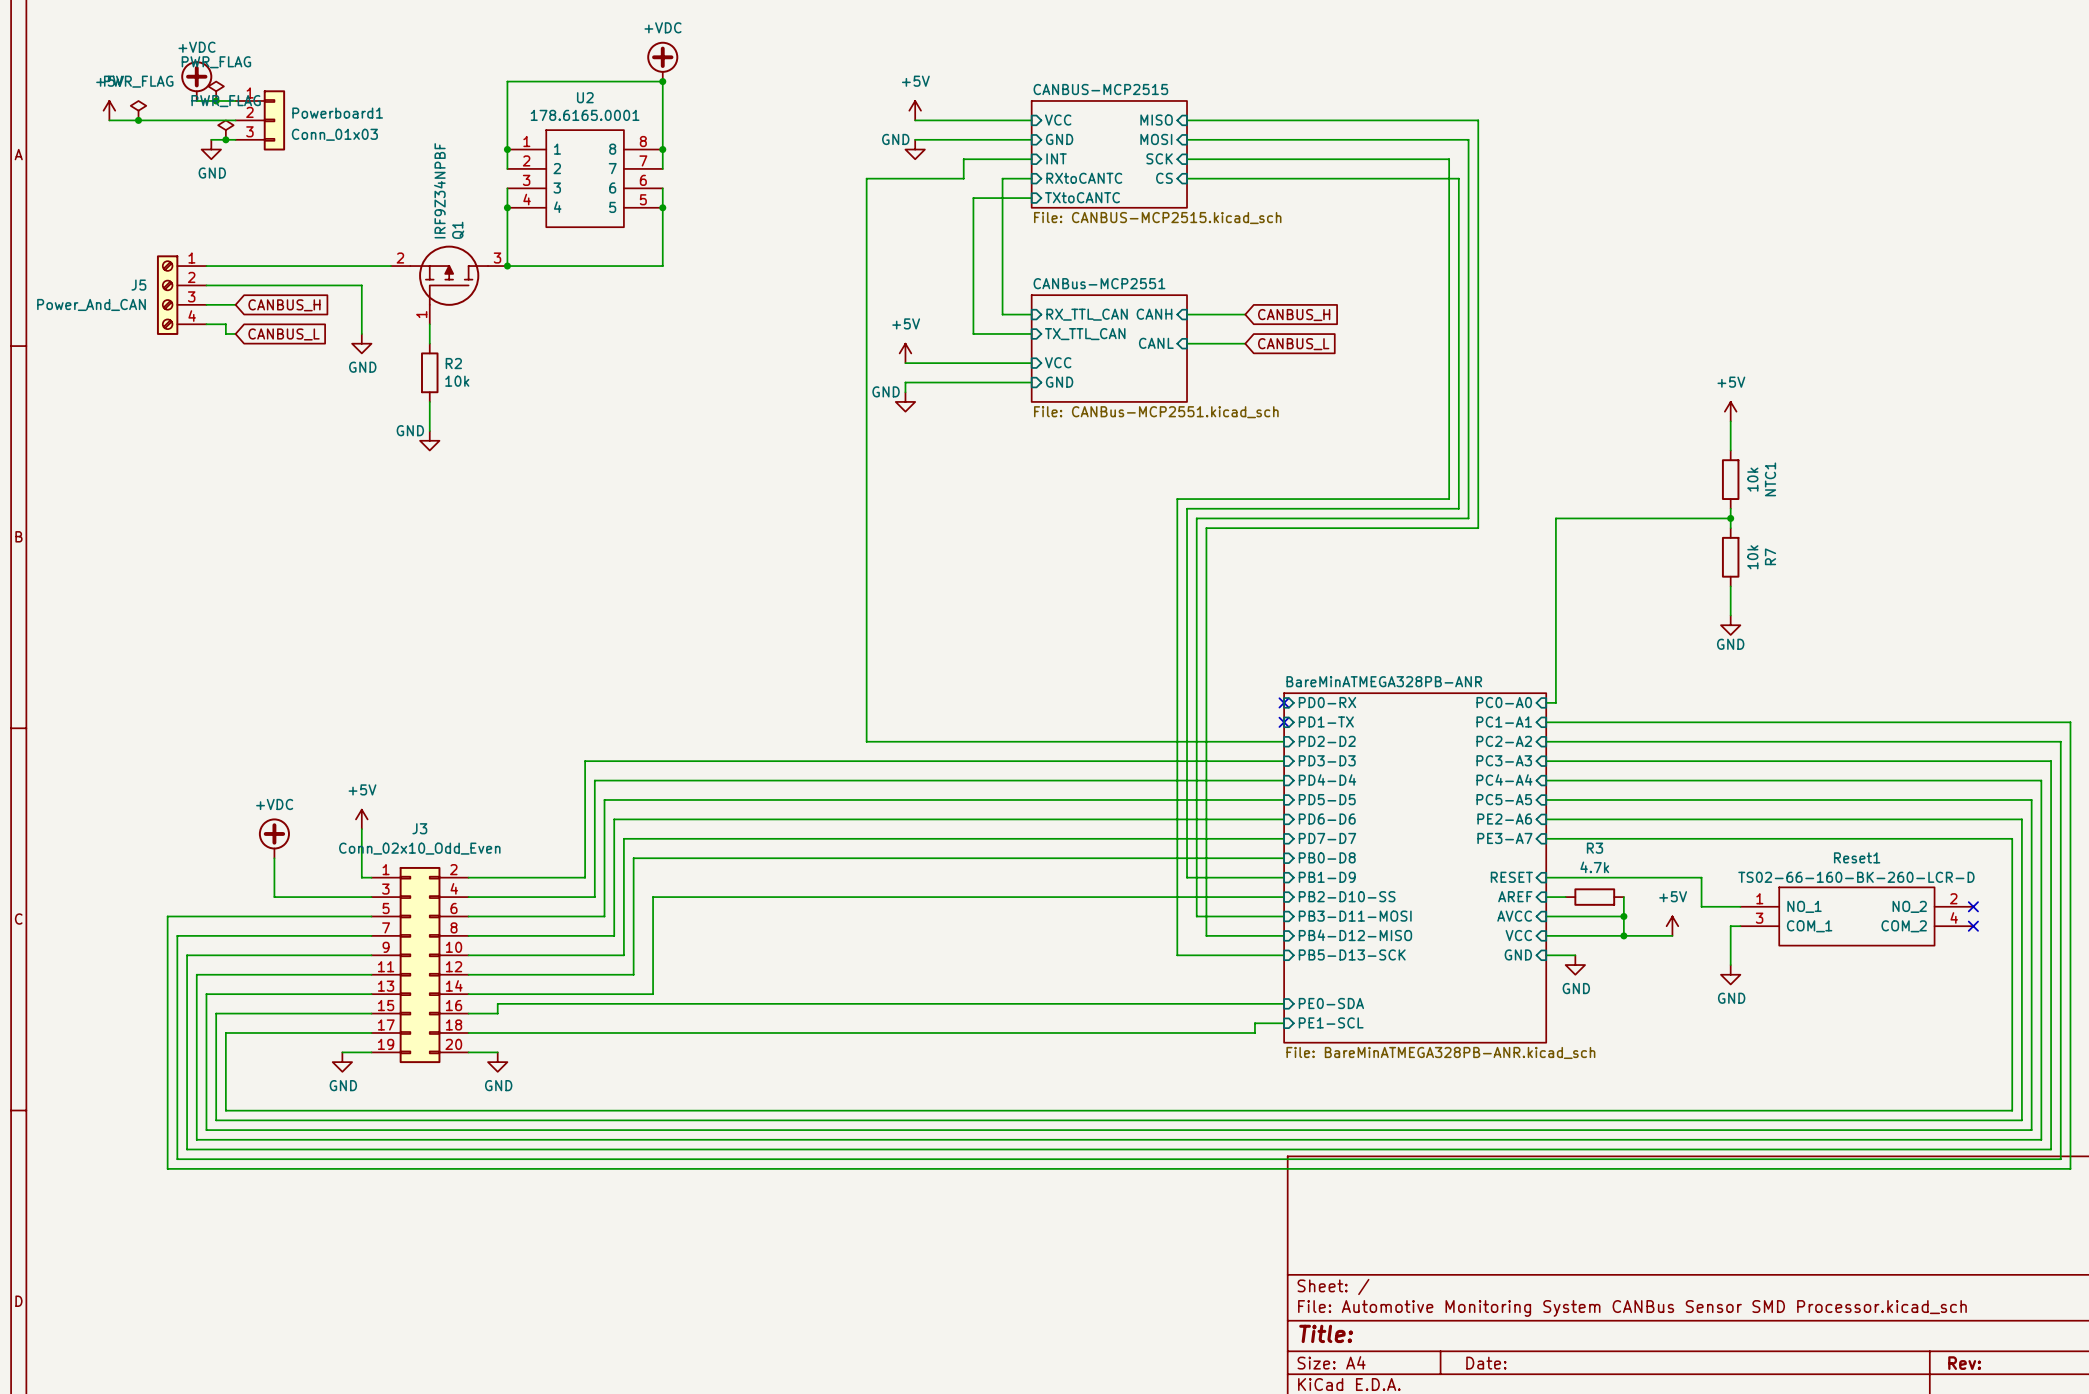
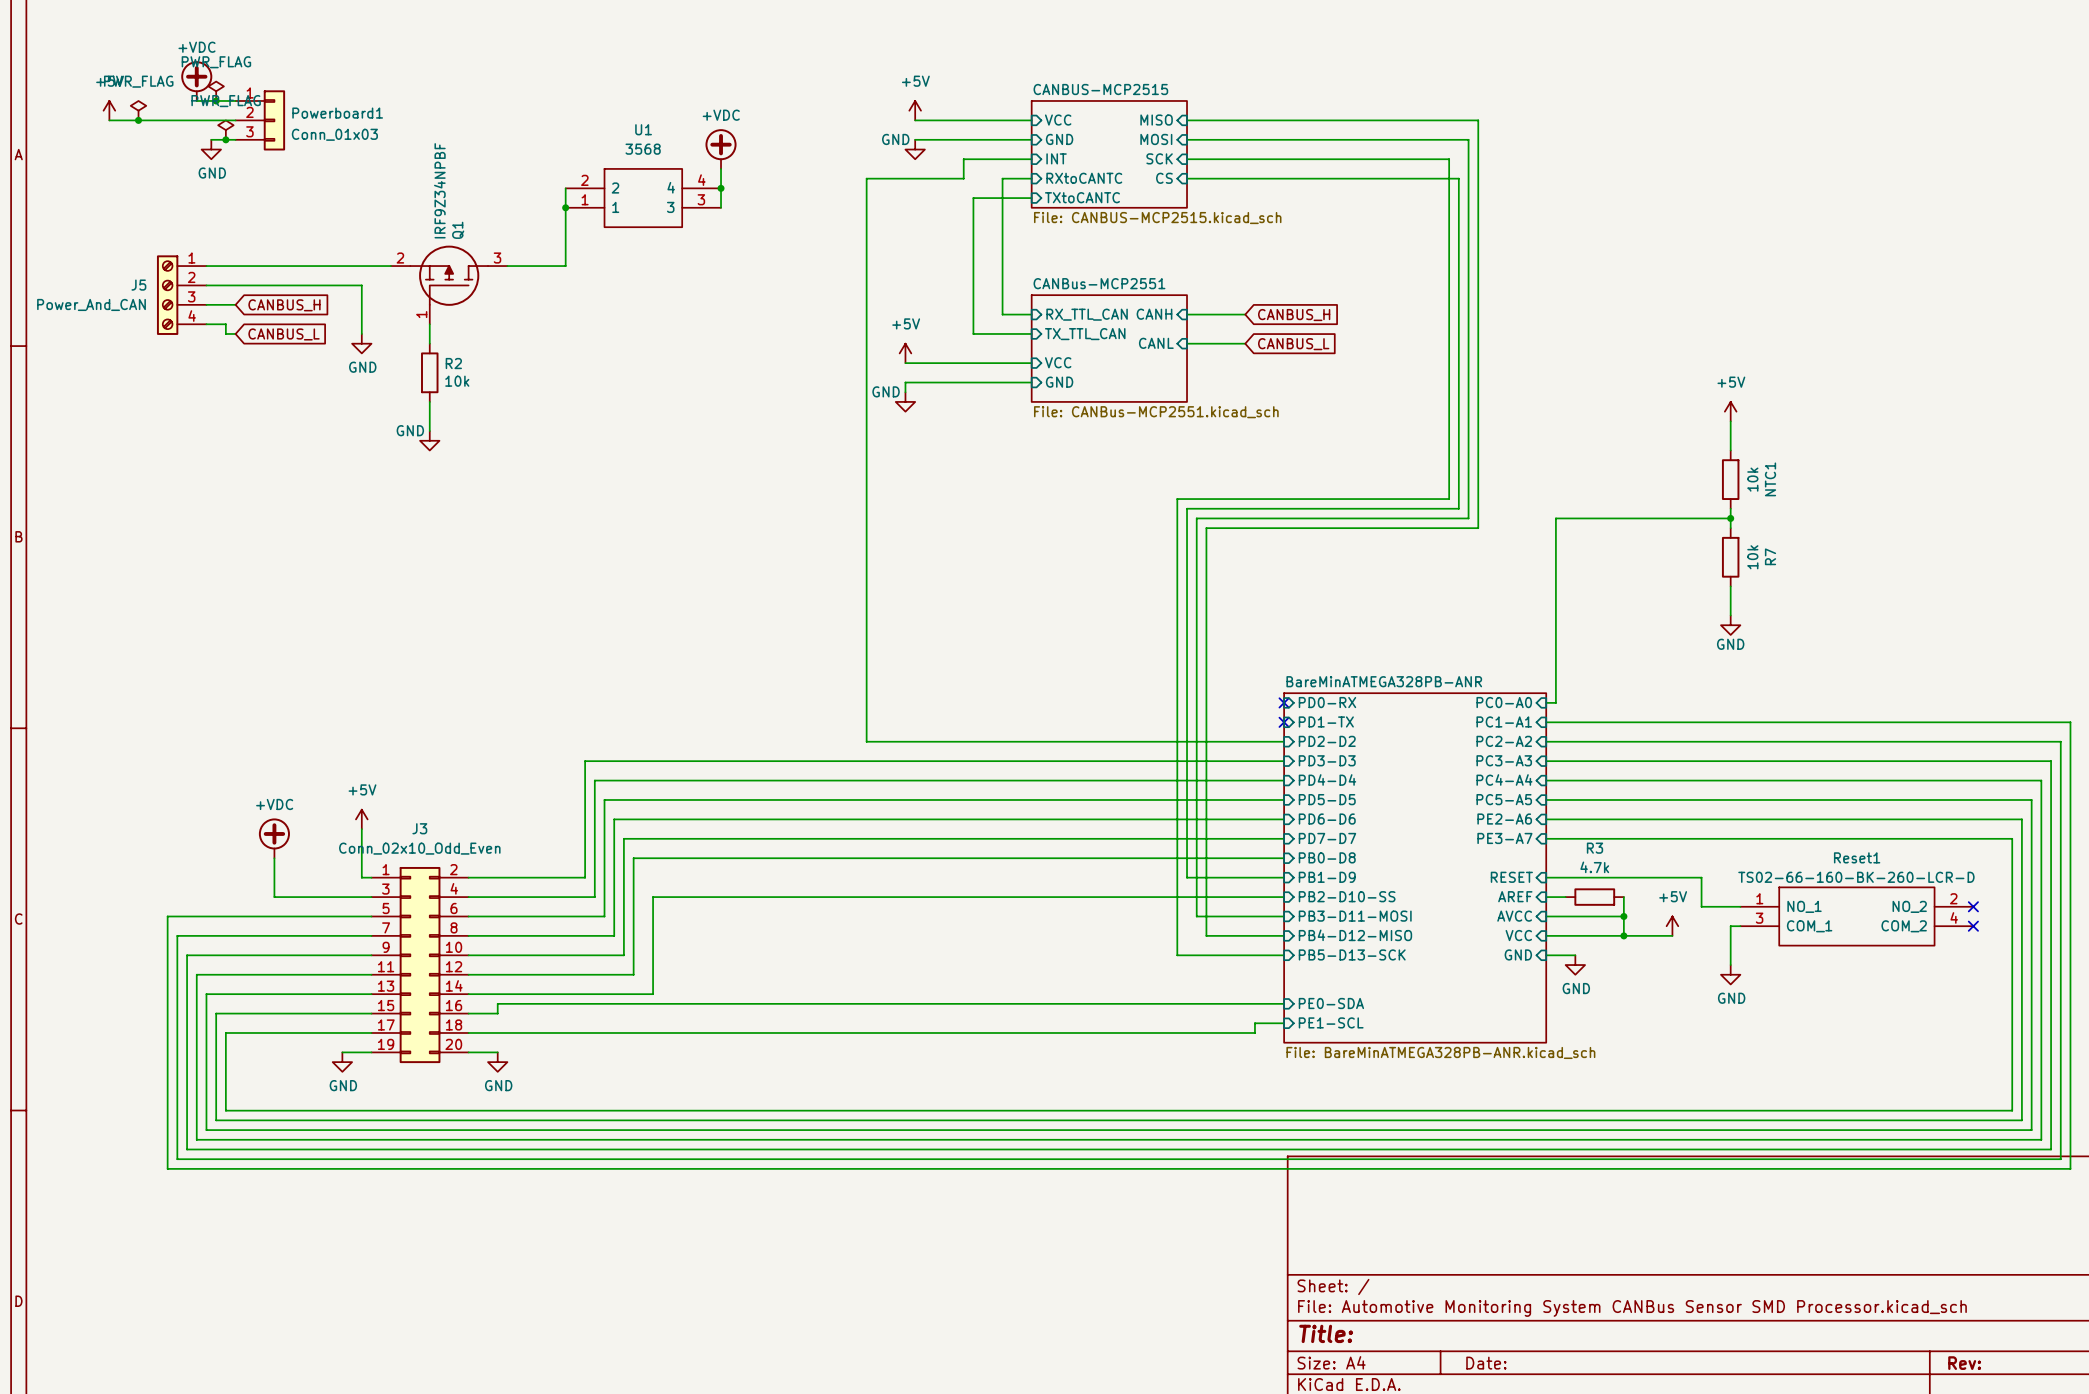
power symbol position: +VDC (662, 61) -> +VDC (721, 149)
junction: (662, 81) -> none
junction: (507, 149) -> none
junction: (662, 149) -> none
wire: (507, 168) (507, 81) (662, 81) (662, 168) -> none
wire: none -> (721, 168) (721, 207)
U2: 178.6165.0001 (585, 178) -> none
wire: (507, 188) (507, 266) -> none
wire: (662, 188) (662, 266) (565, 266) -> (565, 188) (565, 266)
junction: none -> (721, 188)
U1: none -> 3568 (643, 198)
junction: (507, 207) -> none
junction: none -> (565, 207)
junction: (662, 207) -> none
junction: (507, 266) -> none

